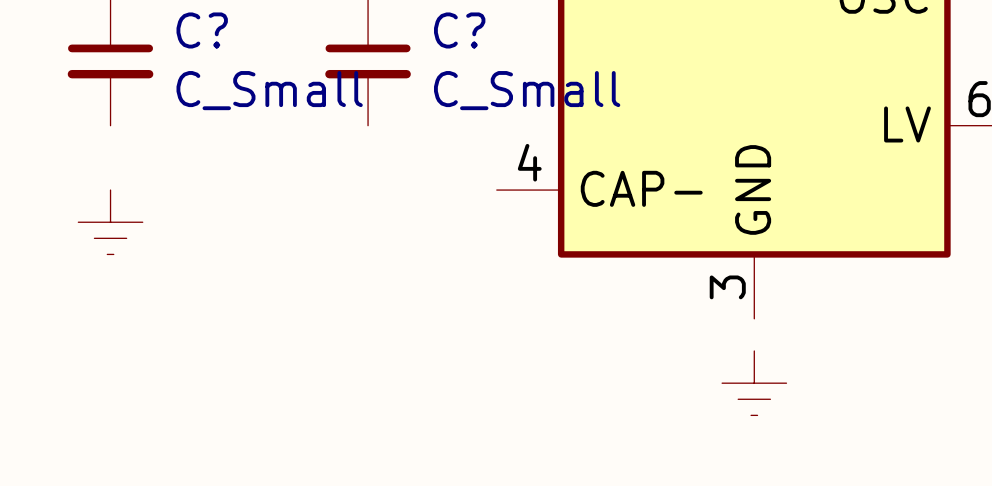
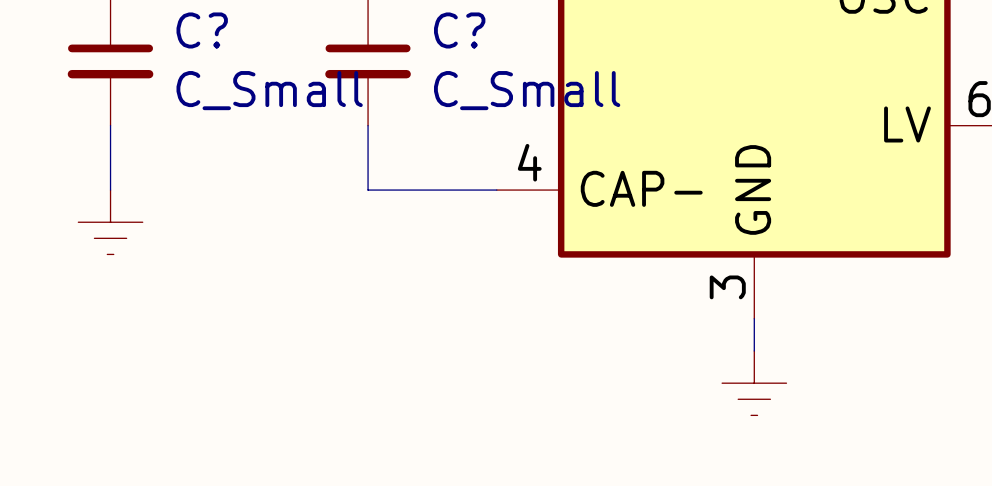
wire: none -> (110, 125) (110, 190)
wire: none -> (368, 125) (368, 190) (496, 190)
wire: none -> (754, 318) (754, 350)

